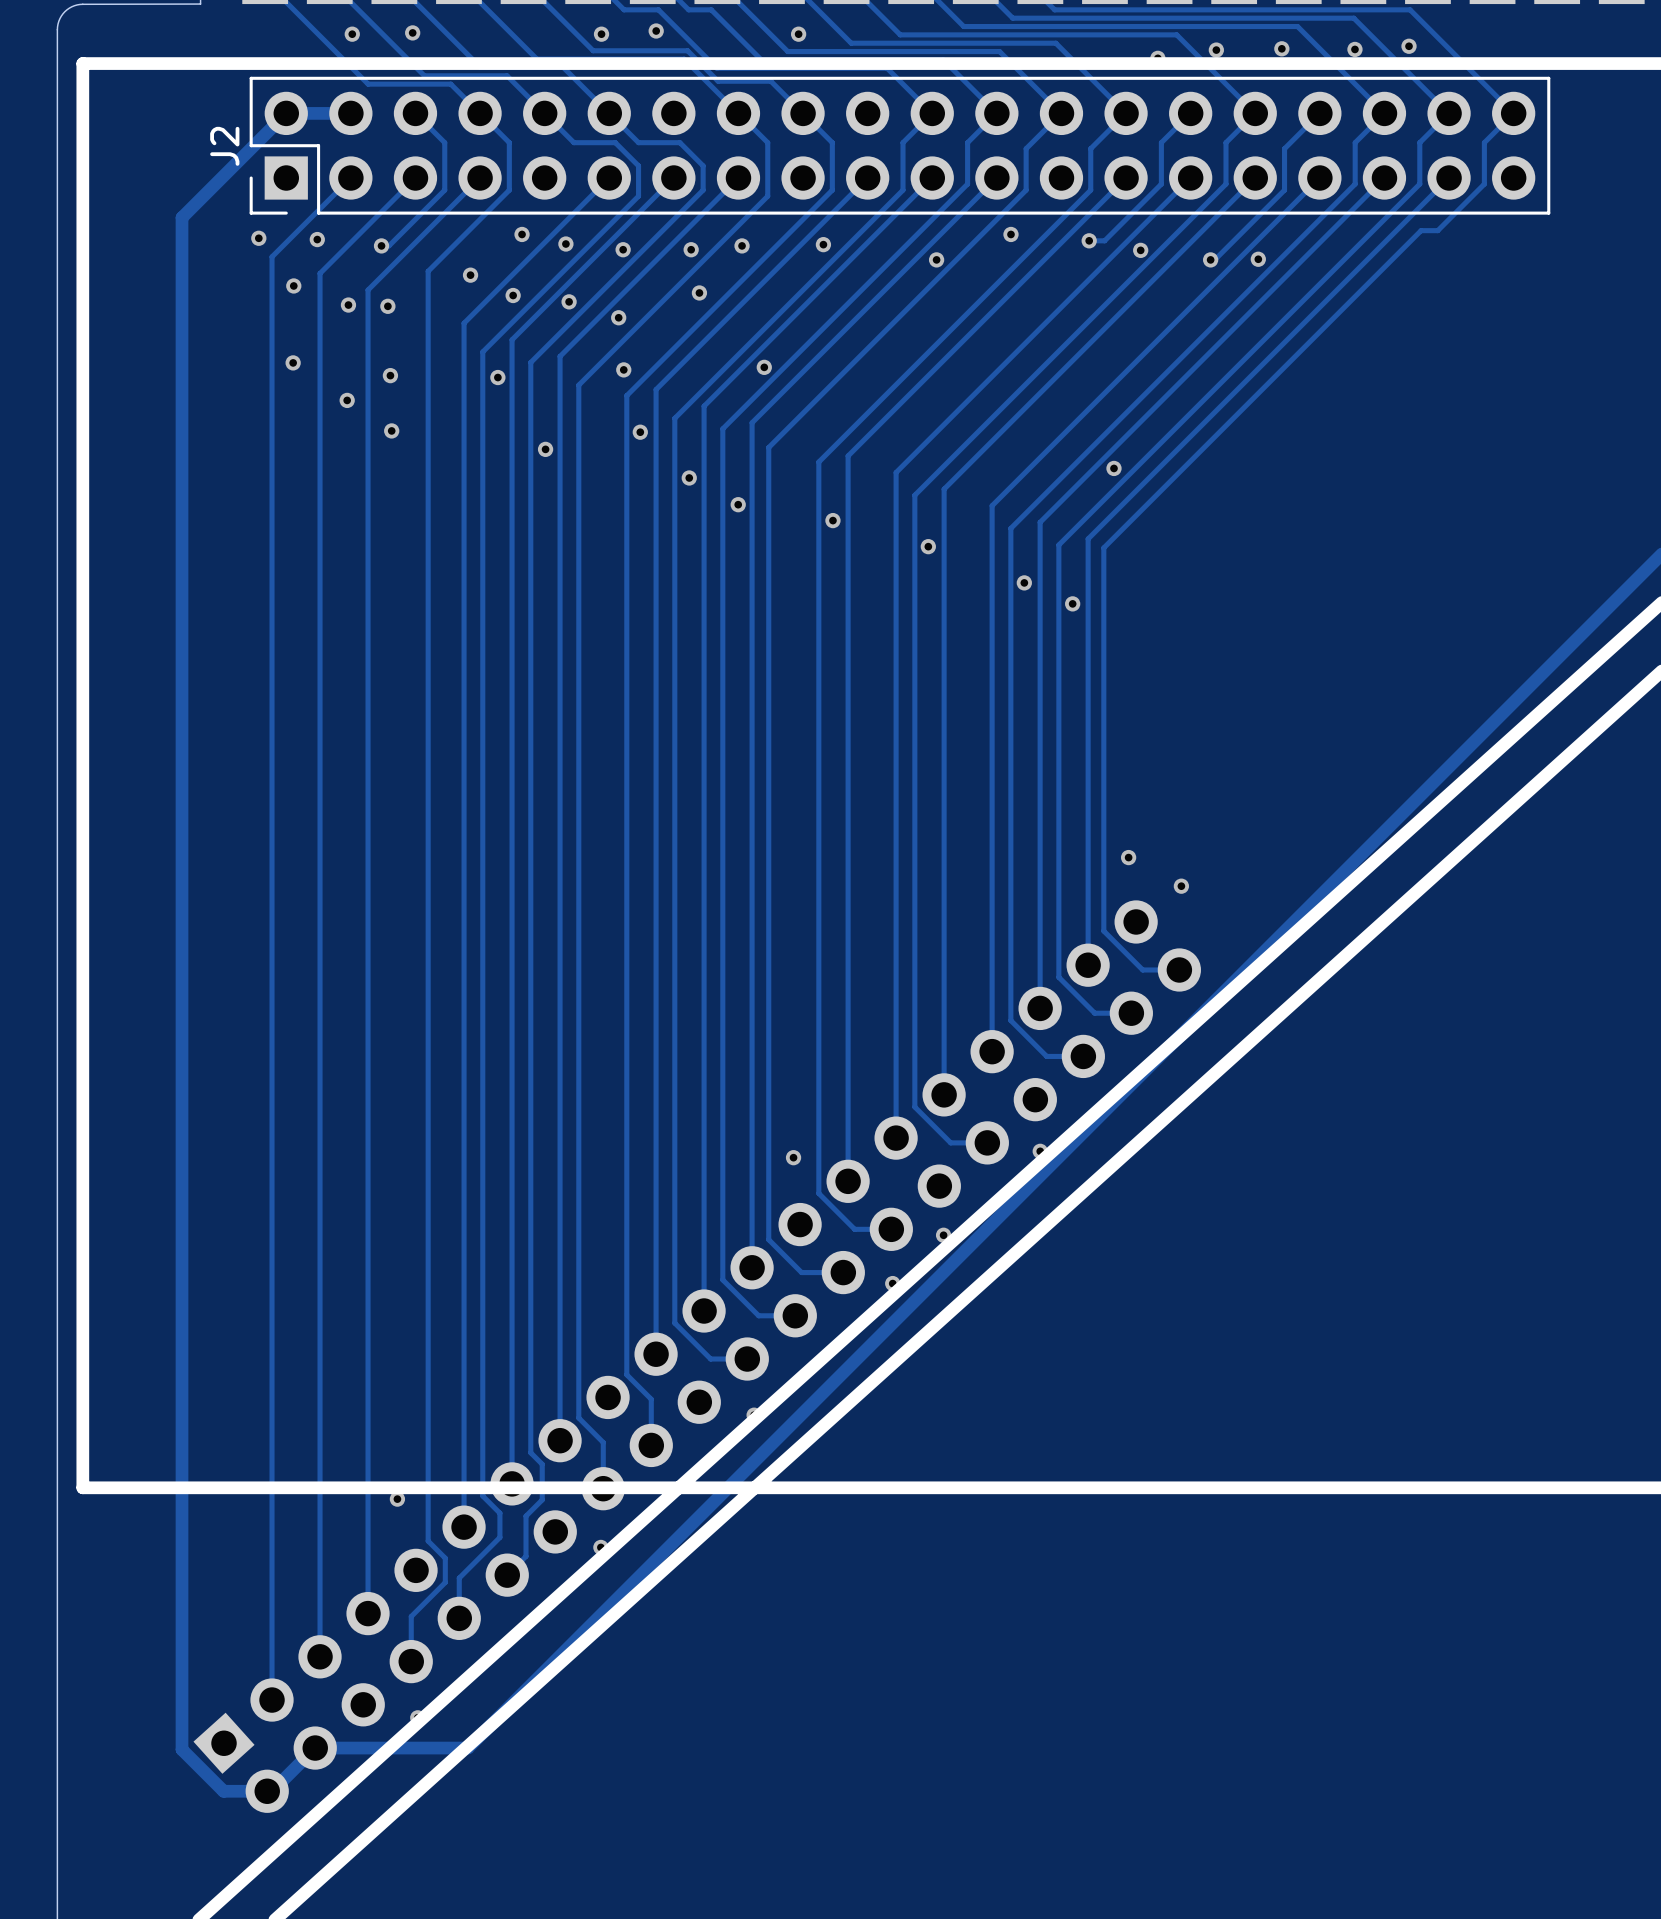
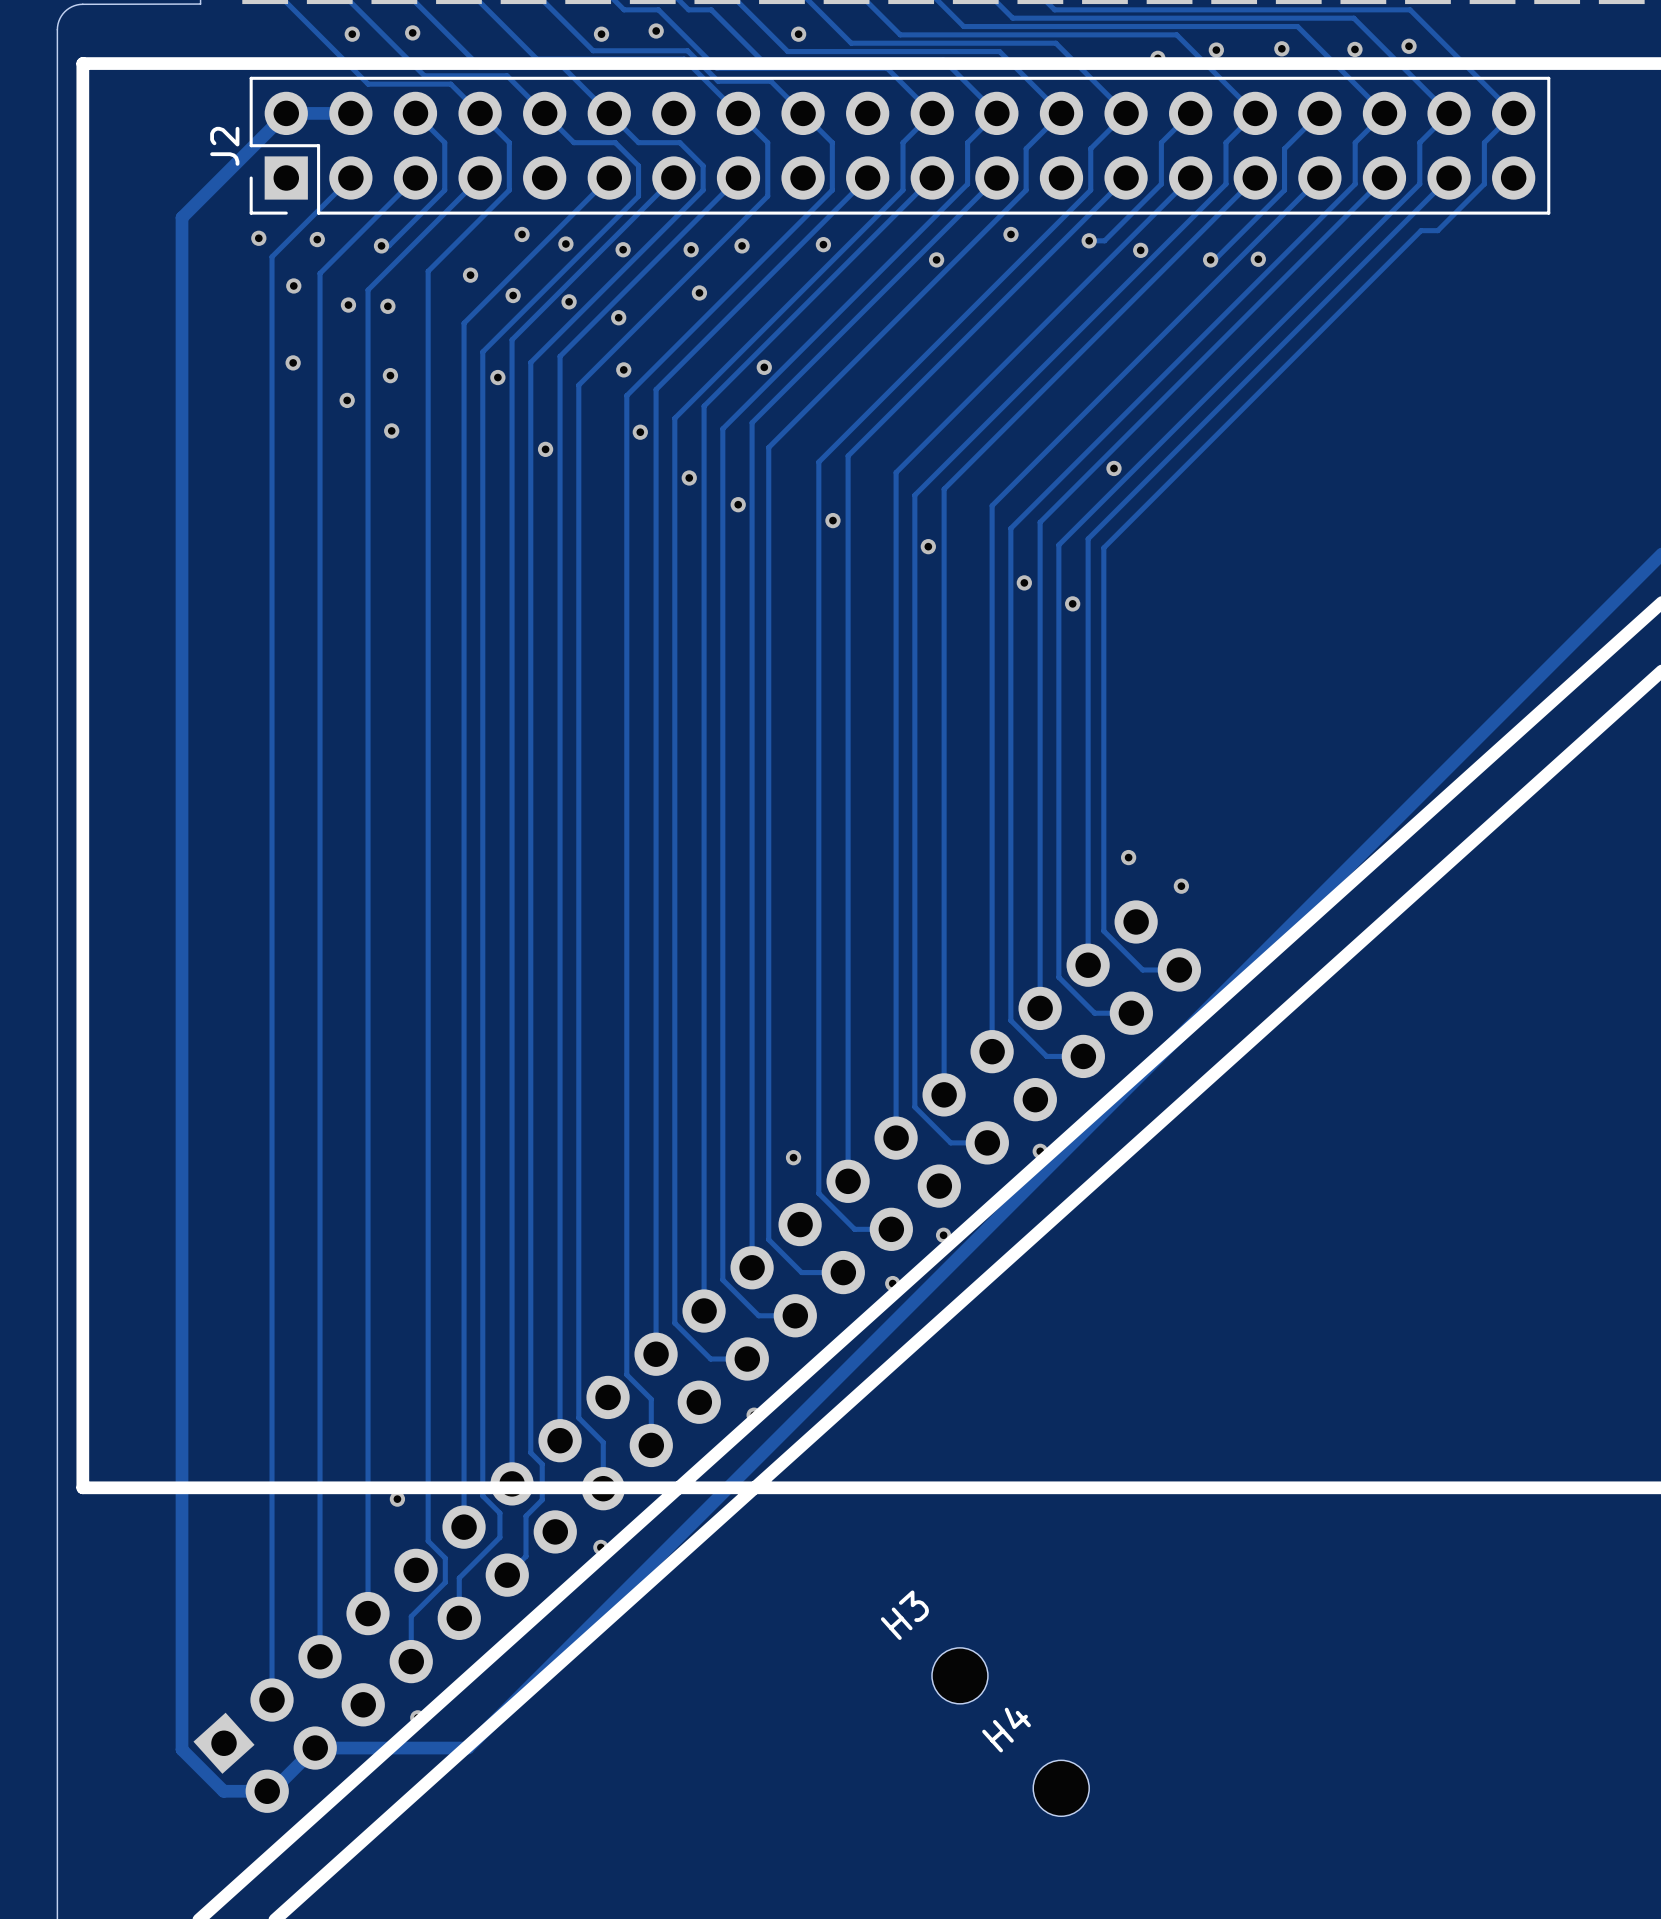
H3: none -> (959, 1675)
H4: none -> (1061, 1788)

